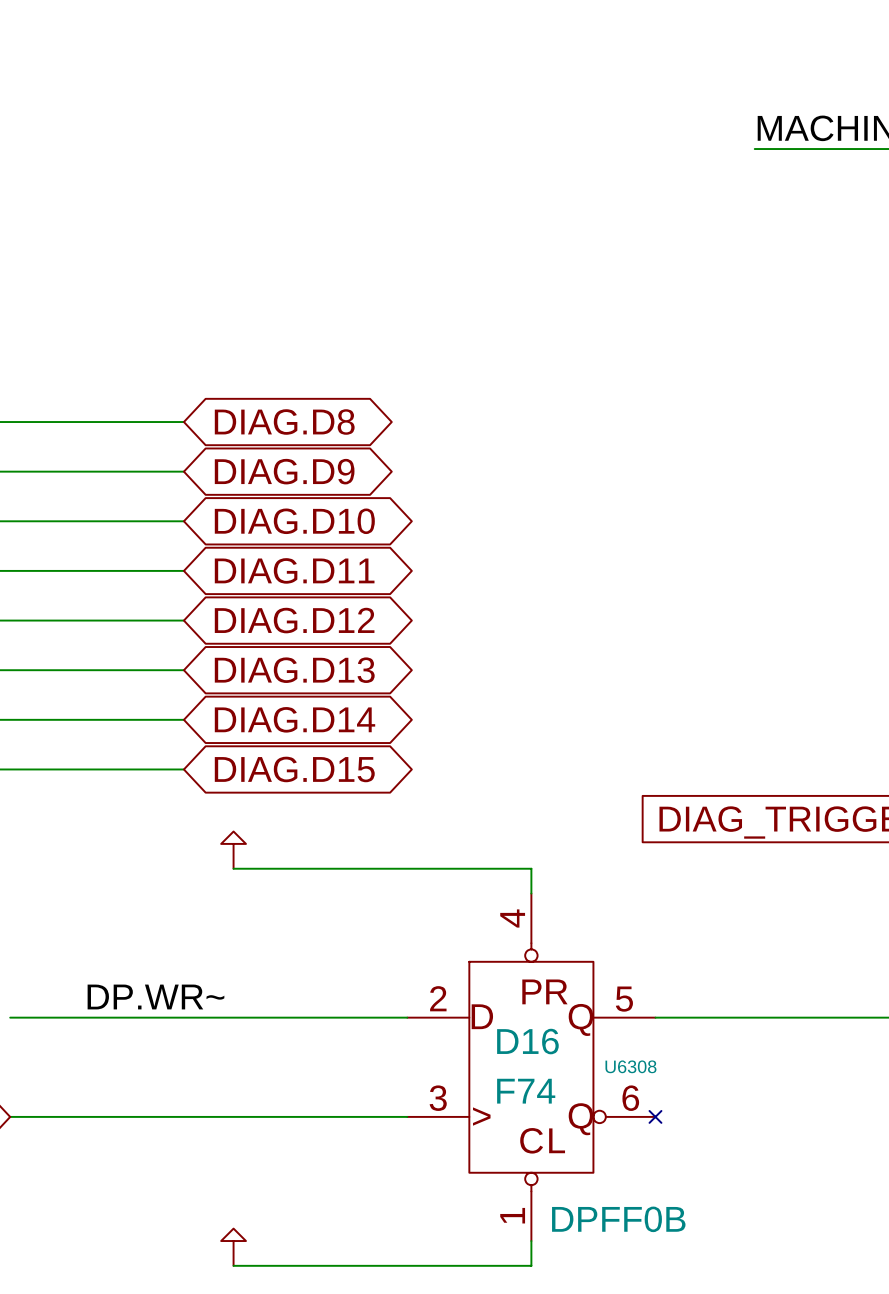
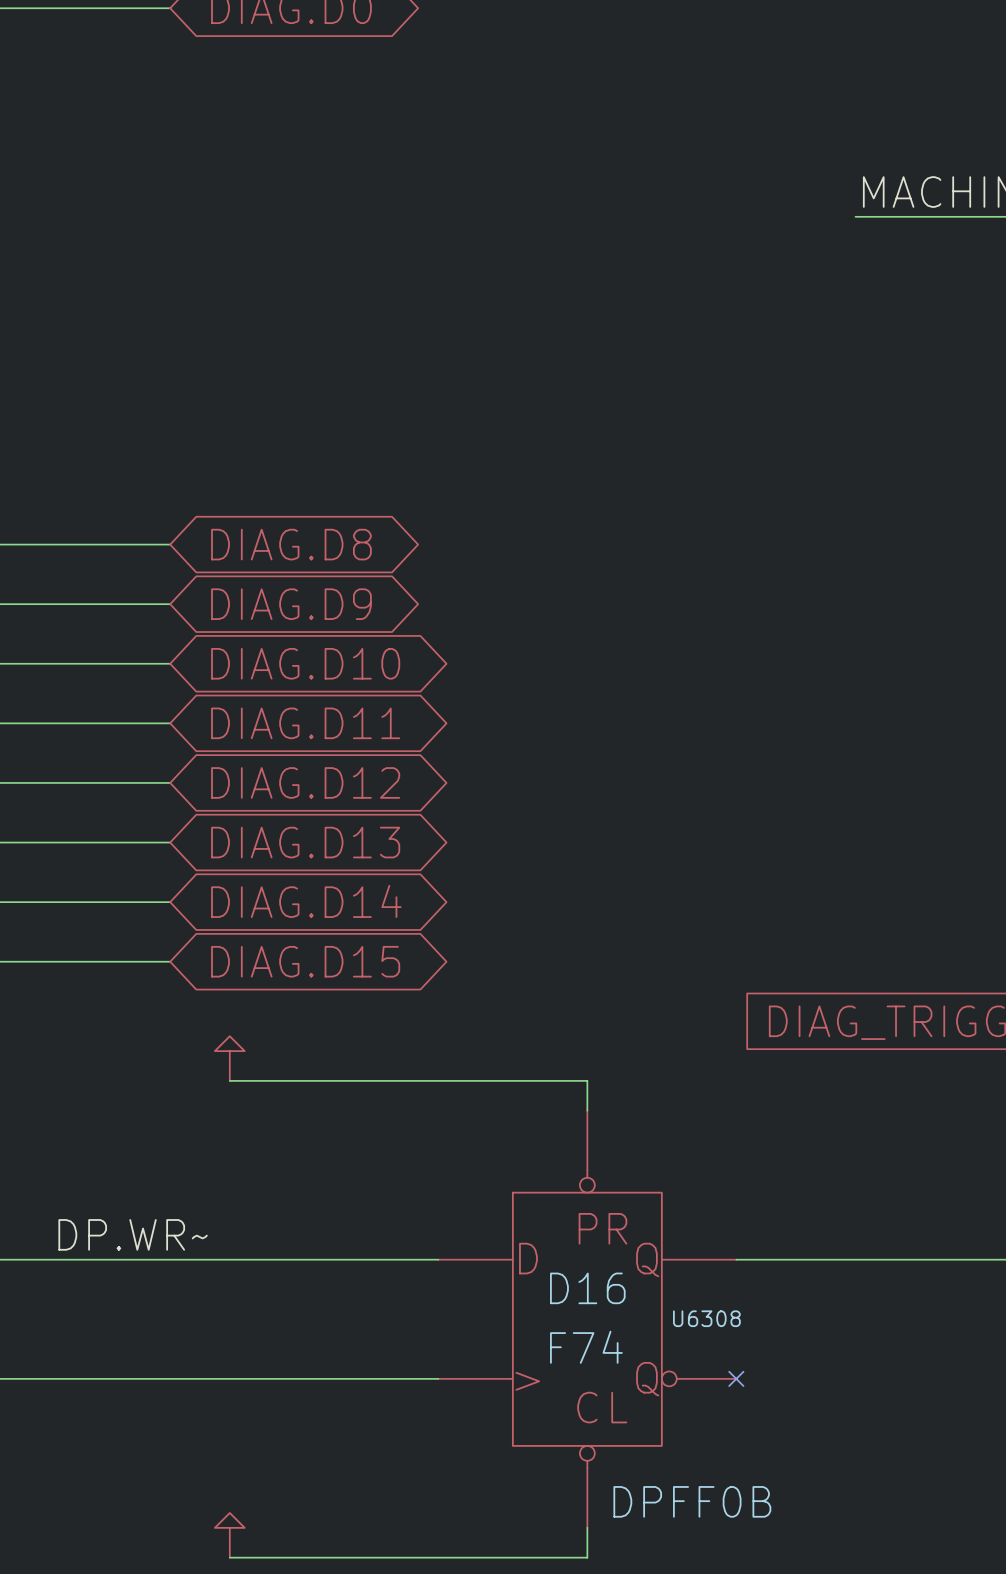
U6308 pin number: 4 (512, 918) -> none
U6308 pin number: 2 (438, 998) -> none
U6308 pin number: 5 (624, 999) -> none
U6308 pin number: 3 (438, 1098) -> none
U6308 pin number: 6 (630, 1098) -> none
U6308 pin number: 1 (512, 1215) -> none

